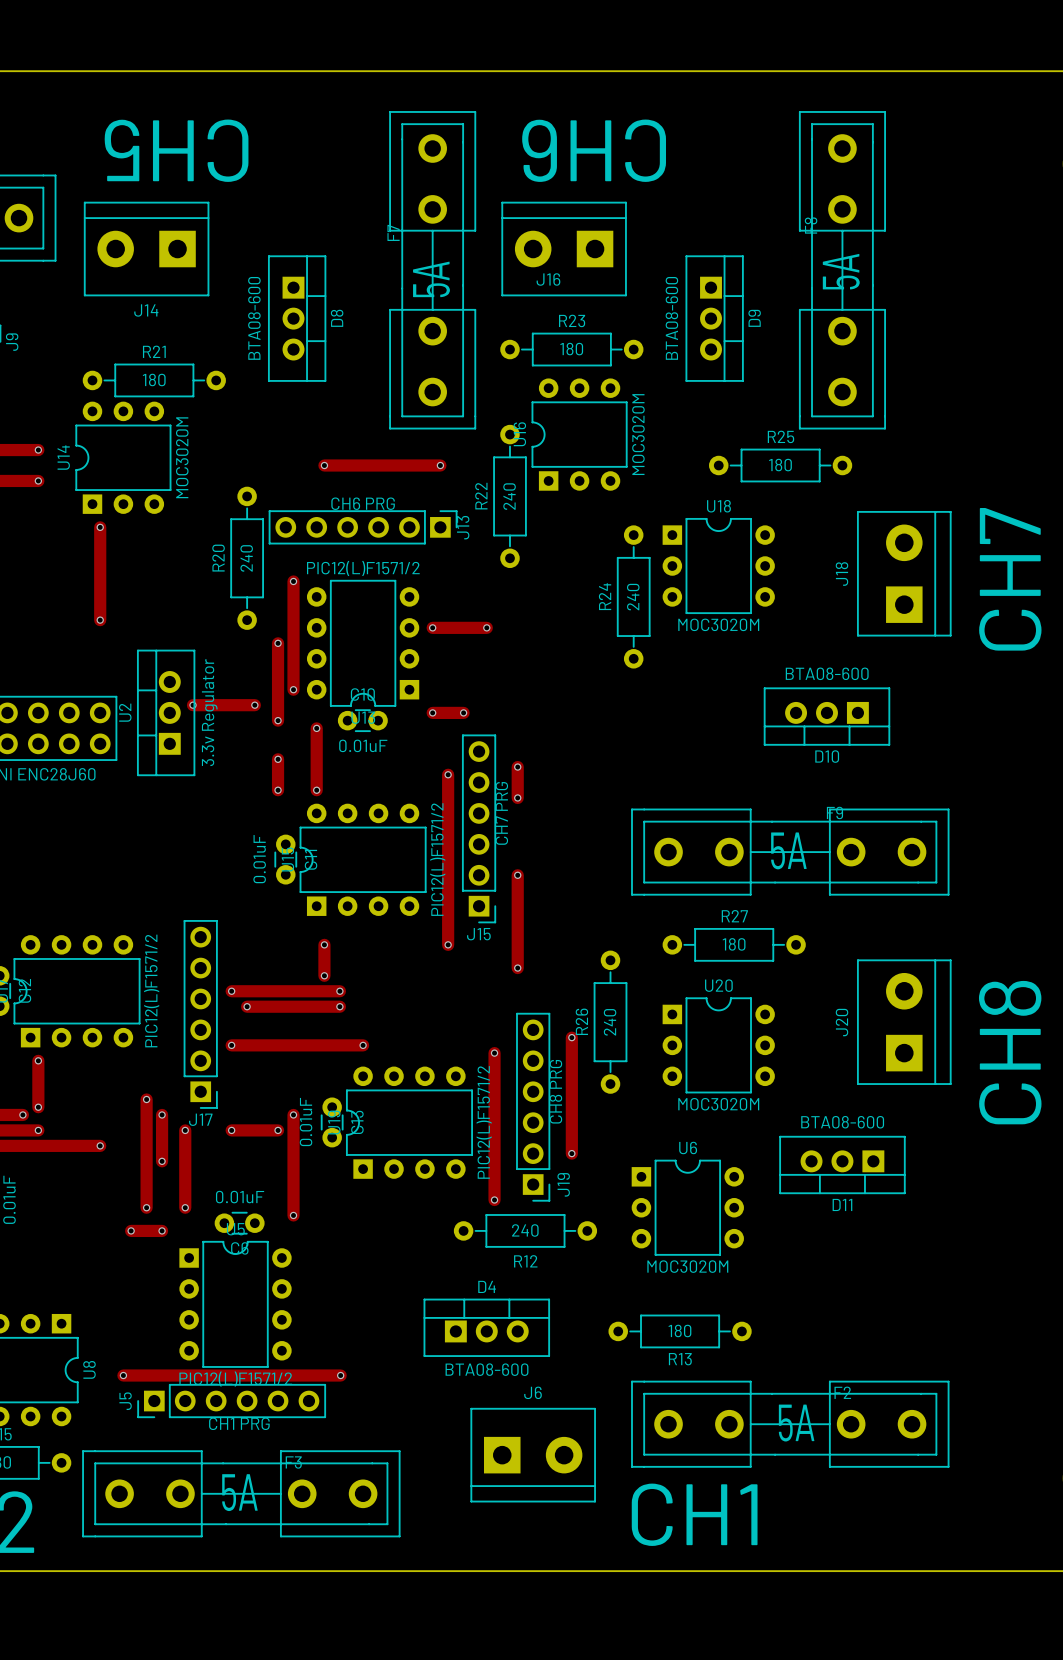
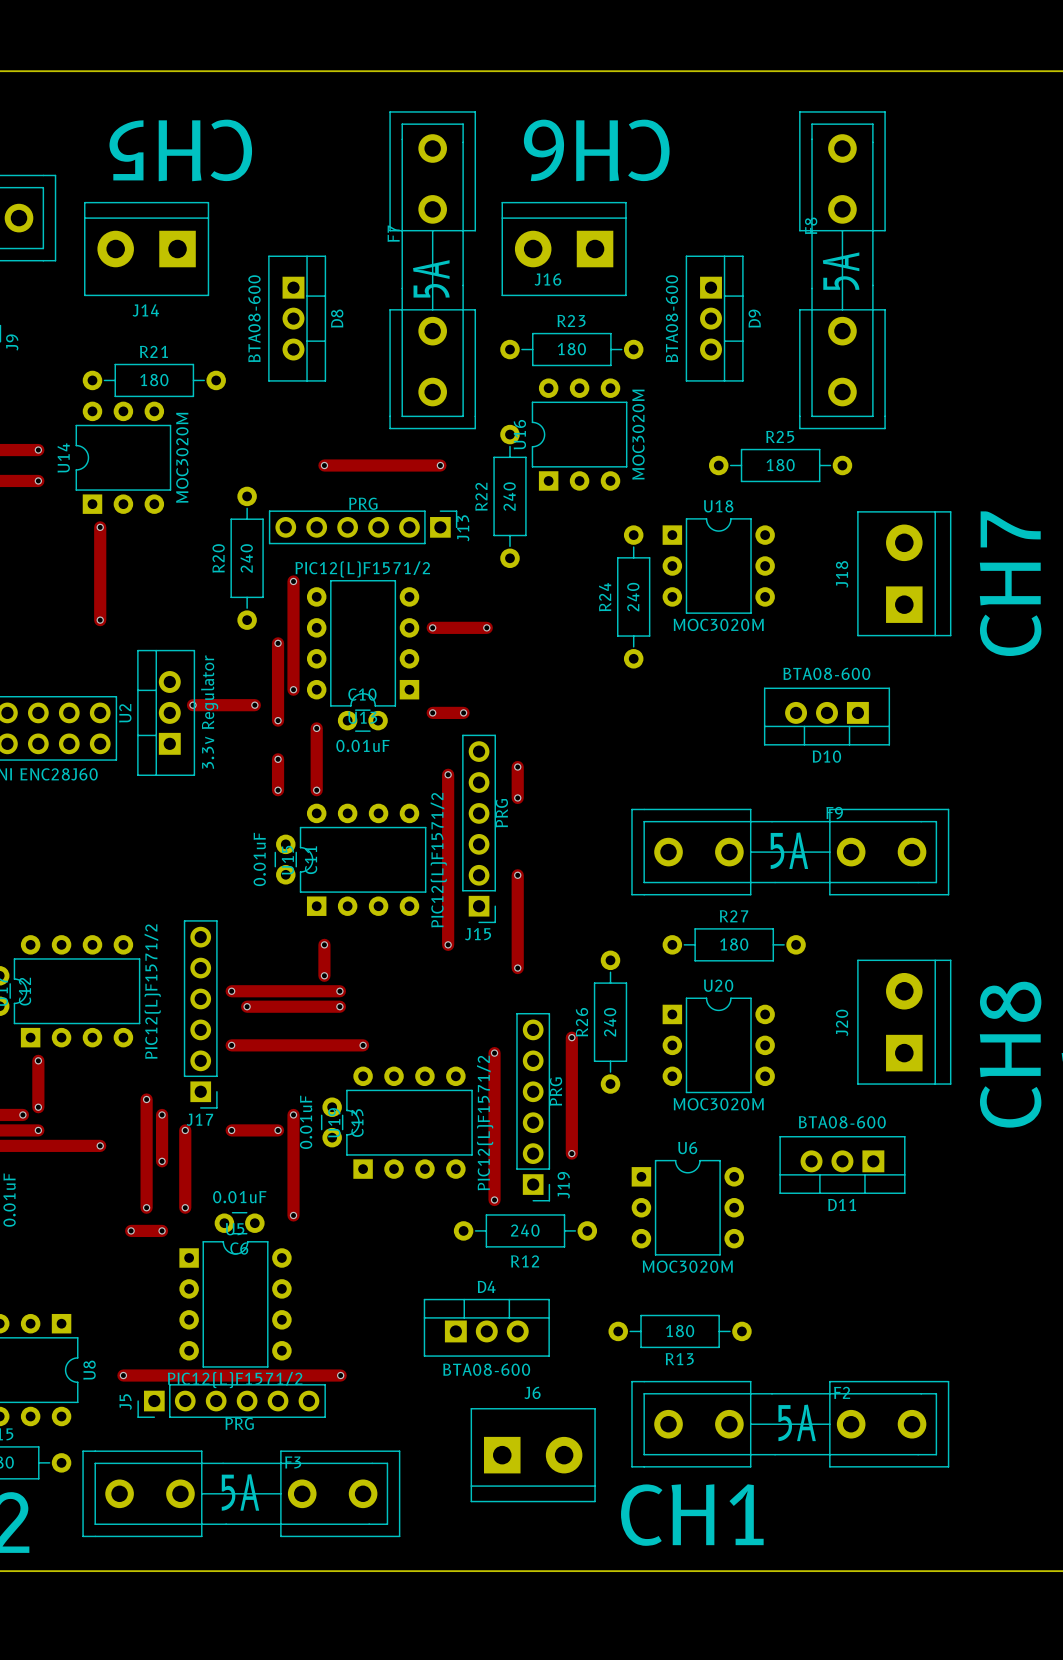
J13 value: CH6 PRG (363, 503) -> PRG (363, 503)
J15 value: CH7 PRG (501, 813) -> PRG (501, 813)
J19 value: CH8 PRG (555, 1091) -> PRG (556, 1091)
J5 value: CH1 PRG (239, 1423) -> PRG (239, 1423)

